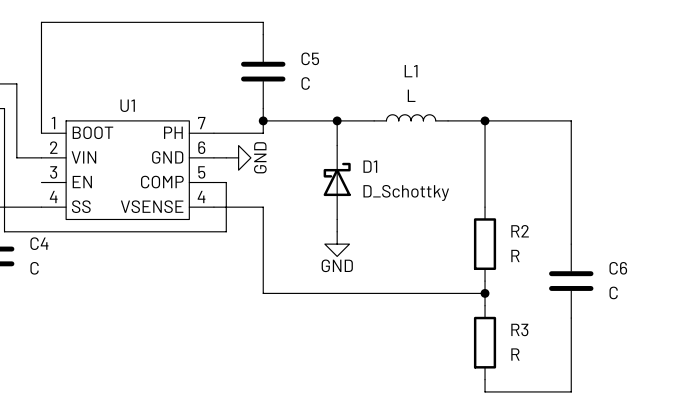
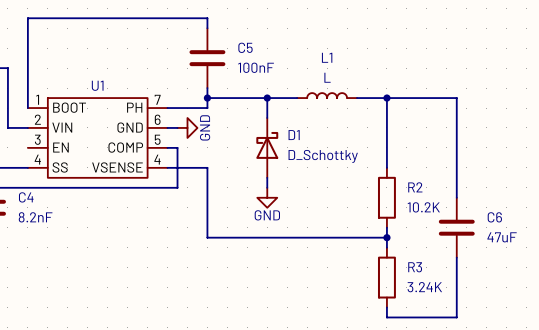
C5 value: C (305, 83) -> 100nF (256, 67)
R2 value: R (515, 255) -> 10.2K (423, 207)
C4 value: C (34, 268) -> 8.2nF (35, 217)
C6 value: C (613, 292) -> 47uF (502, 237)
R3 value: R (515, 354) -> 3.24K (424, 287)

